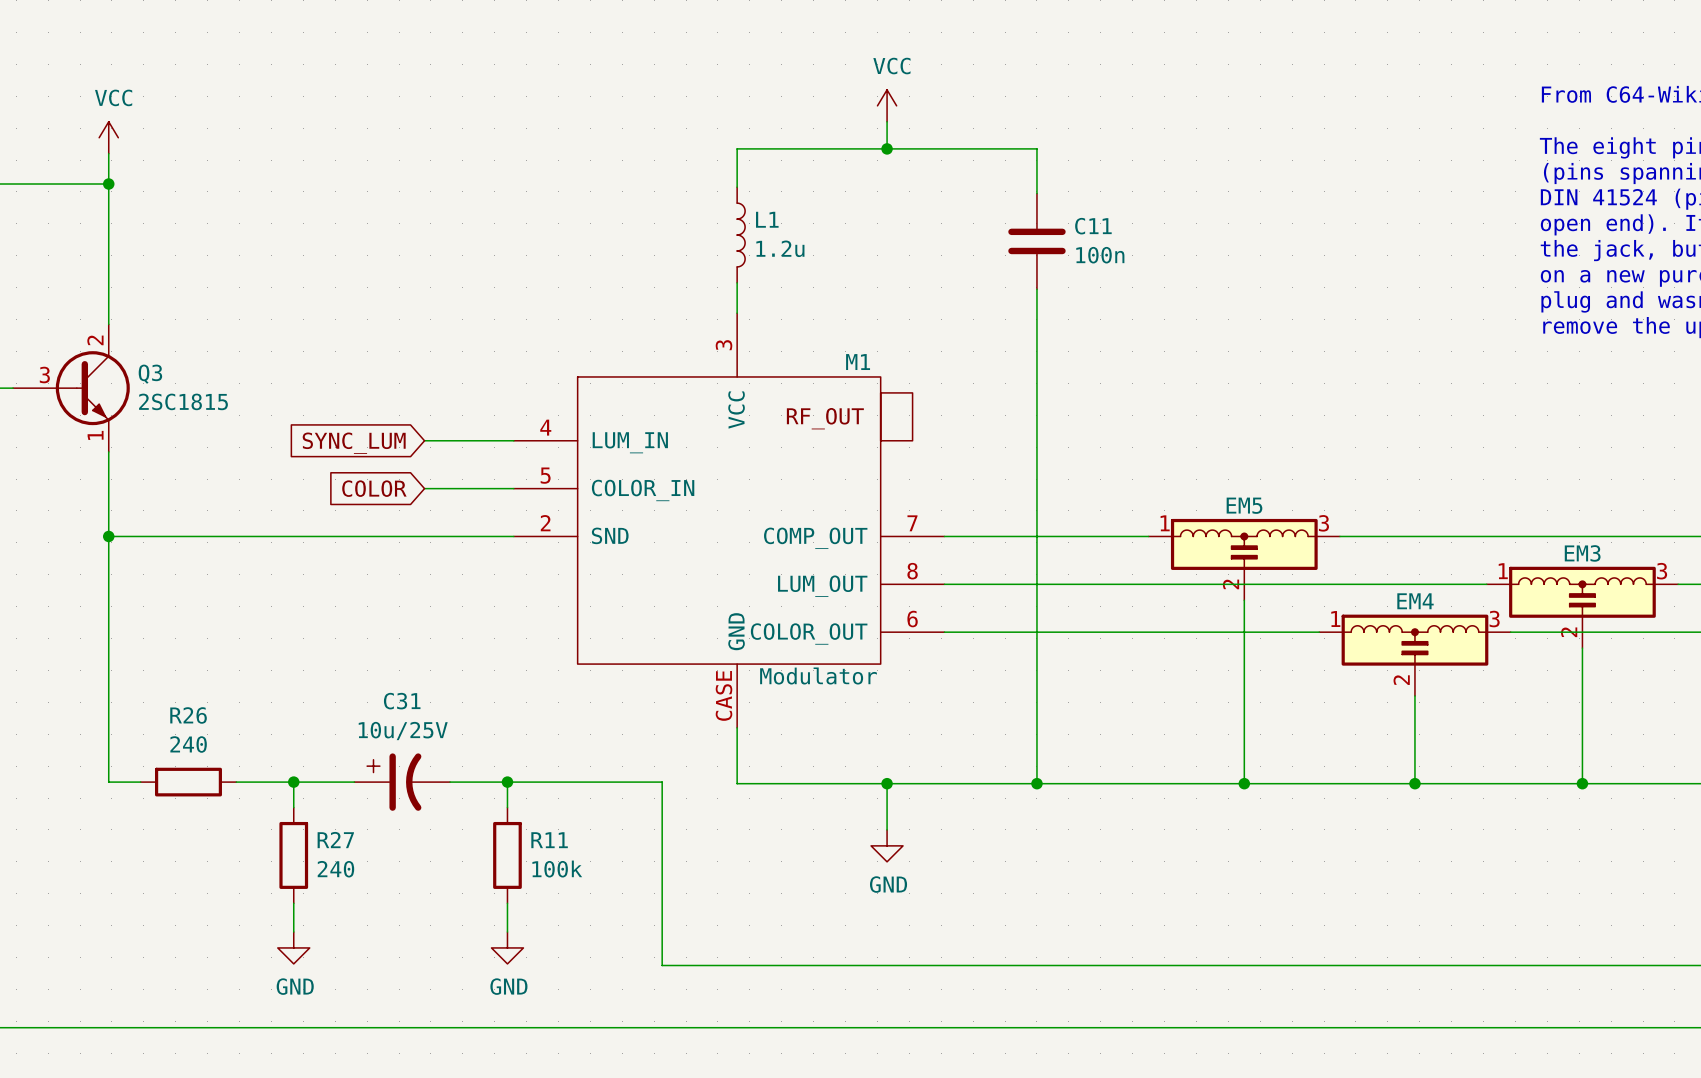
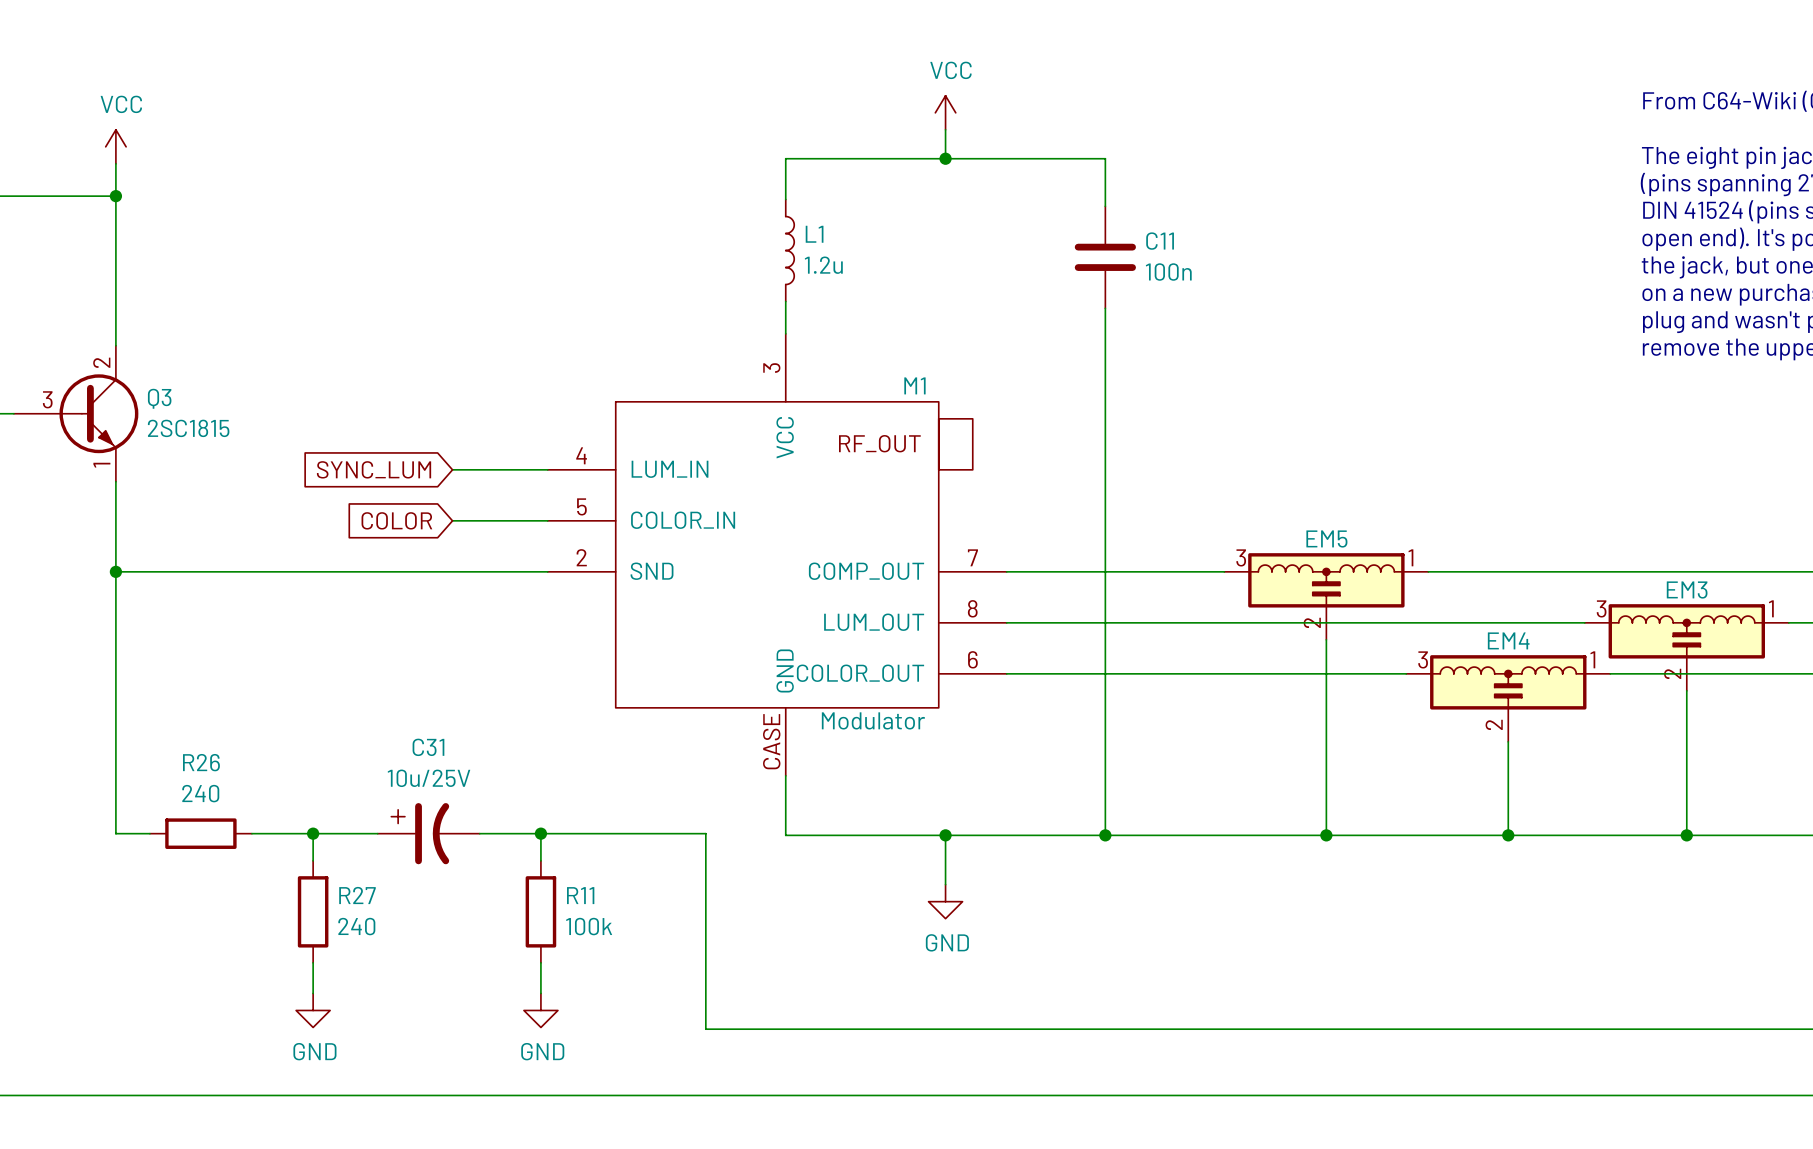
EM5 flip: as is (1244, 544) -> left-right (1326, 580)
EM3 flip: as is (1582, 592) -> left-right (1686, 631)
EM4 flip: as is (1414, 640) -> left-right (1508, 682)

